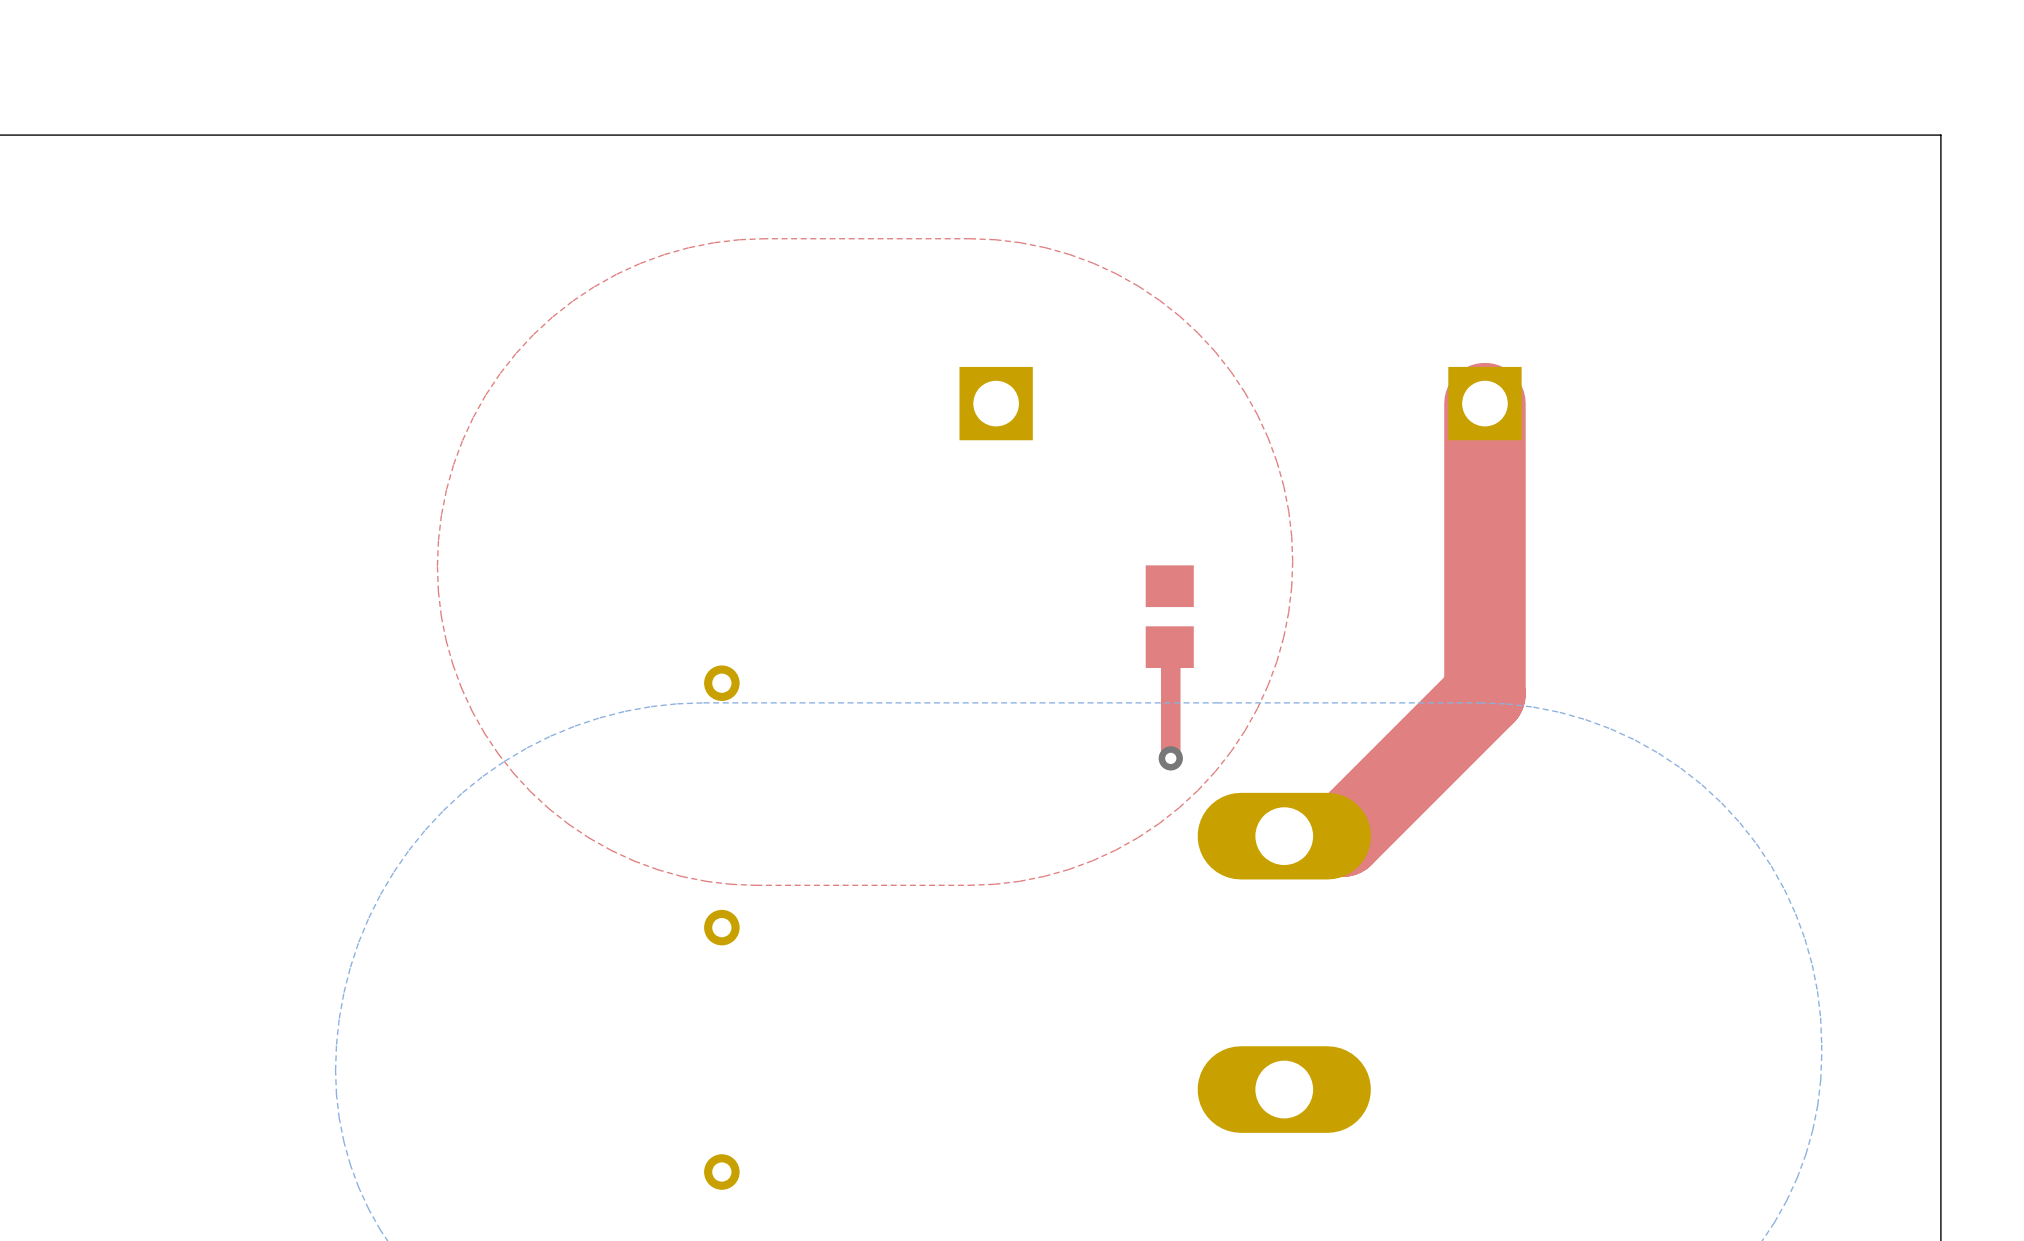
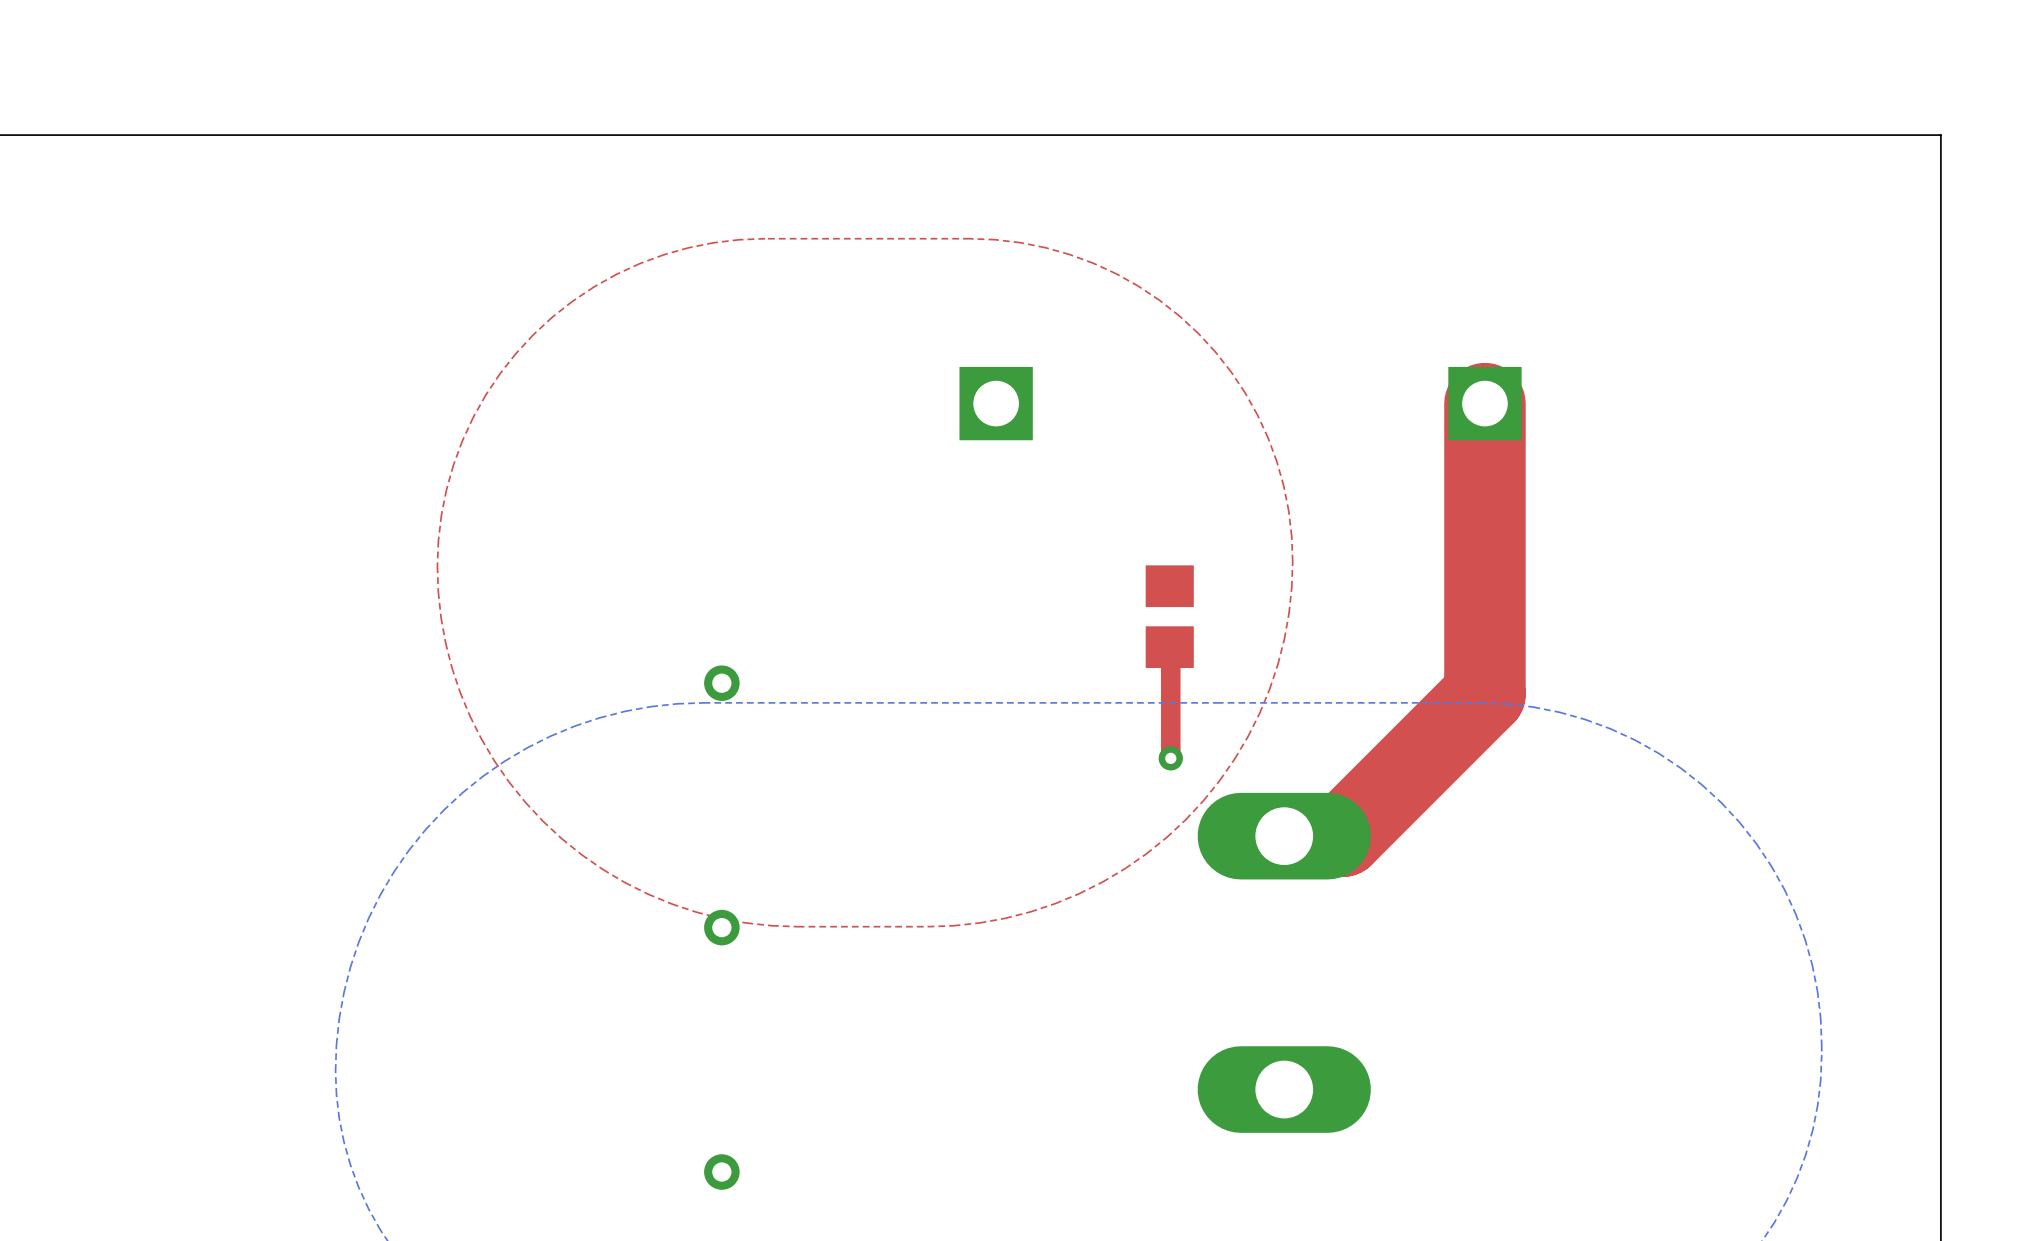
top zone outline: (1292, 561) (1288, 612) (1276, 661) (1268, 685) (1245, 730) (1230, 751) (1197, 790) (1159, 823) (1115, 850) (1092, 860) (1069, 869) (1019, 881) (968, 885) (756, 885) (706, 881) (657, 869) (611, 850) (589, 838) (549, 808) (513, 773) (498, 753) (472, 711) (453, 664) (446, 640) (438, 591) (437, 566) -> (1292, 561) (1291, 587) (1284, 639) (1269, 689) (1248, 736) (1234, 758) (1219, 780) (1185, 819) (1166, 837) (1124, 868) (1102, 882) (1055, 903) (1005, 918) (953, 925) (927, 926) (771, 925) (721, 918) (671, 903) (648, 894) (625, 882) (581, 854) (542, 821) (525, 802) (509, 782) (481, 739) (460, 692) (452, 667) (441, 617) (437, 566)

